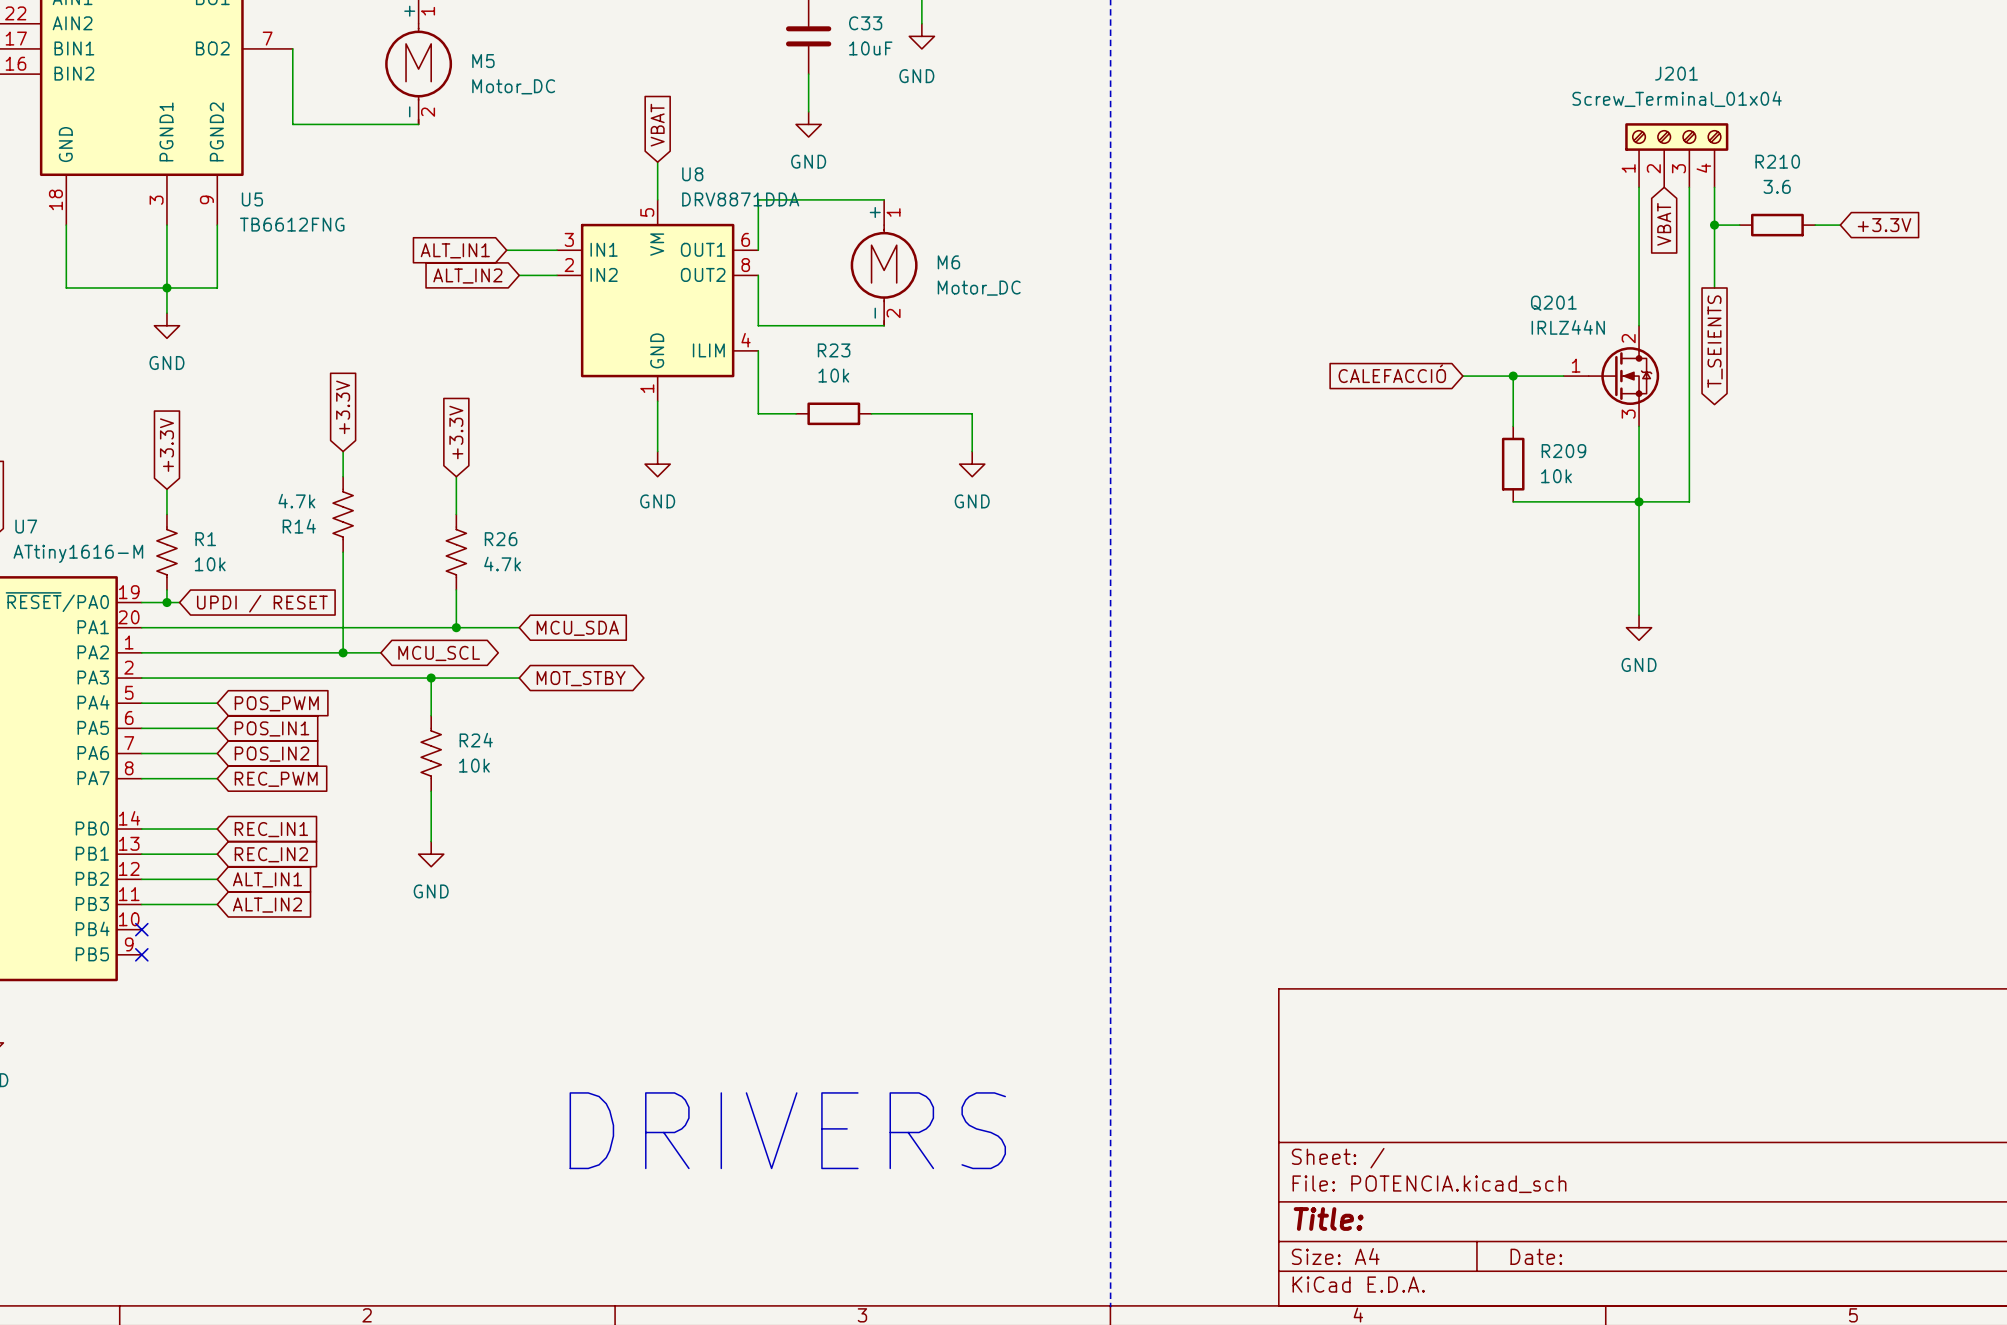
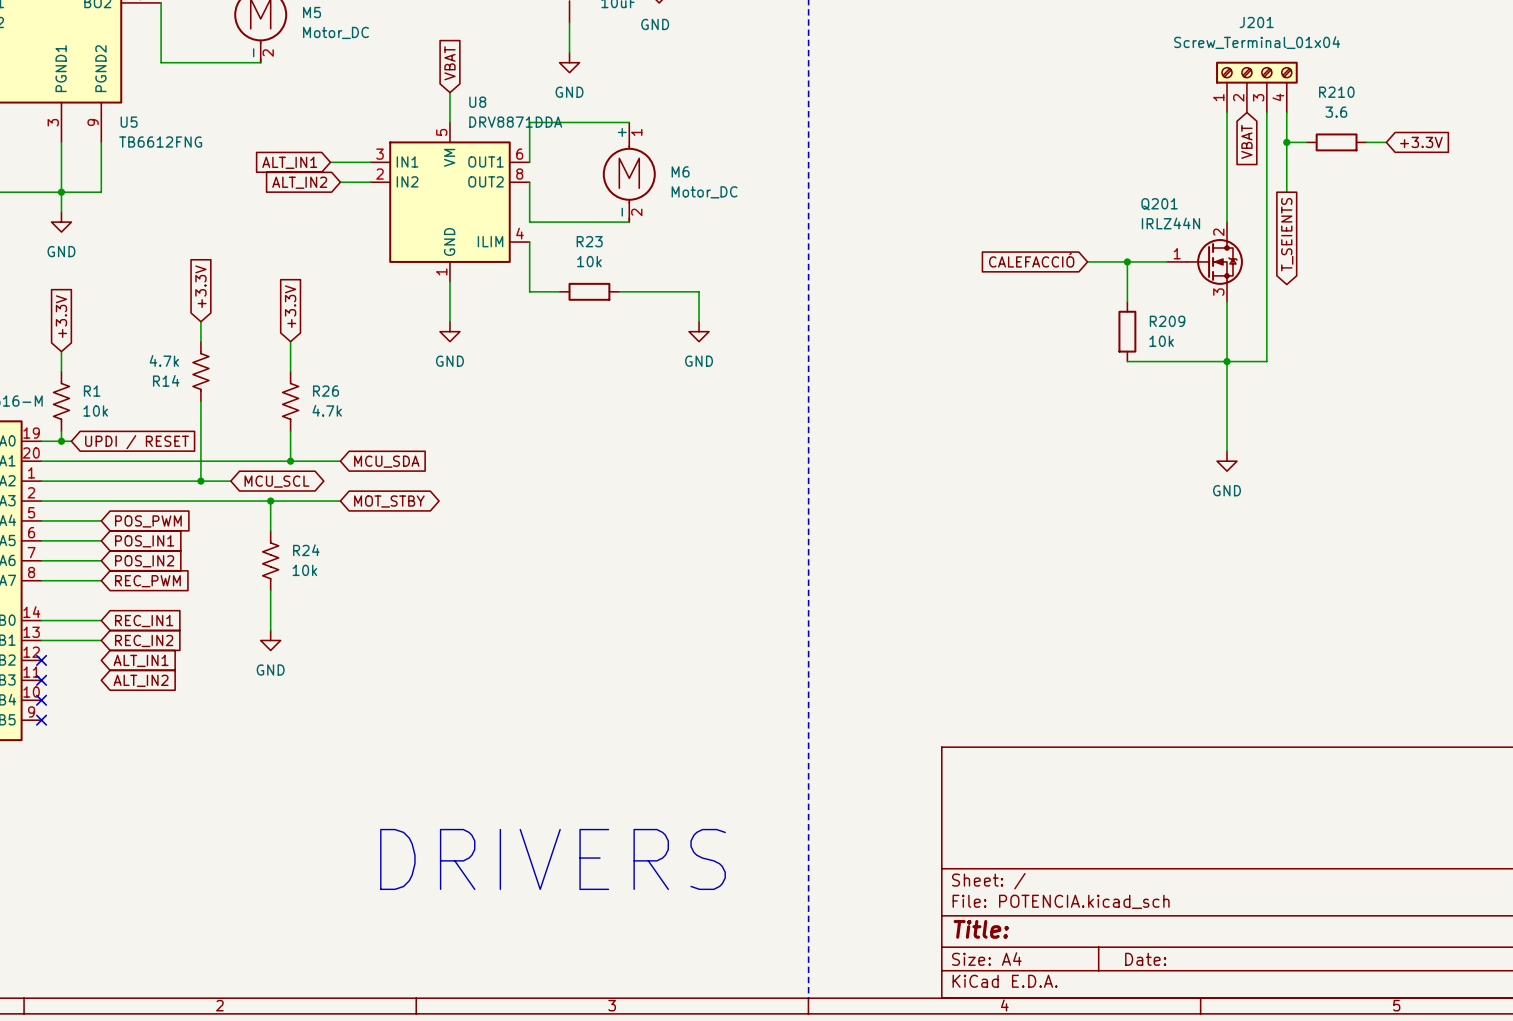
wire: (141, 879) (217, 879) -> none
no-connect mark: none -> (41, 660)
wire: (141, 904) (217, 904) -> none
no-connect mark: none -> (41, 680)

